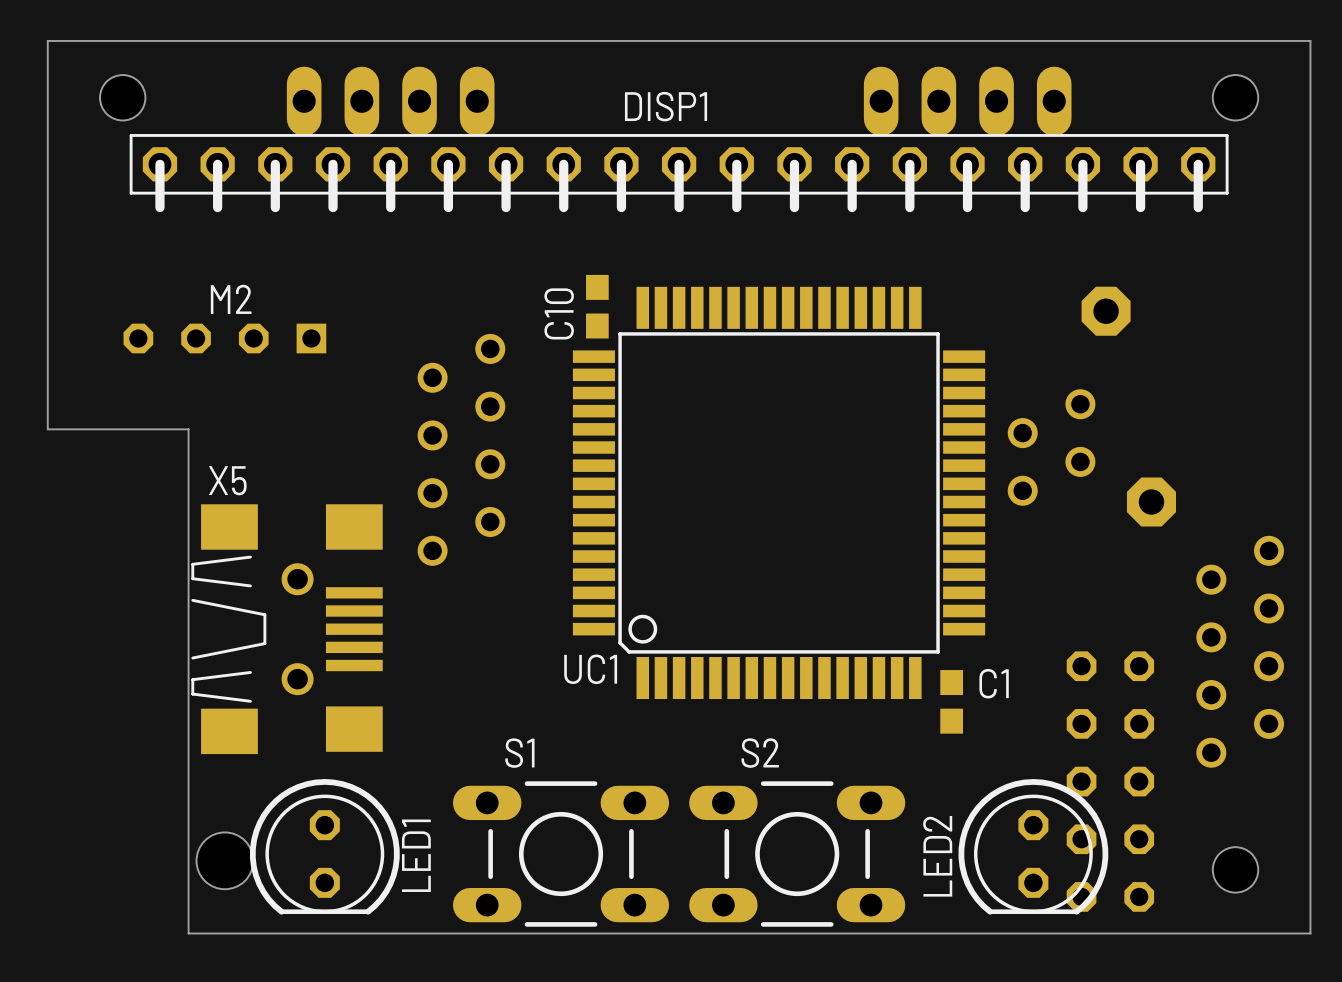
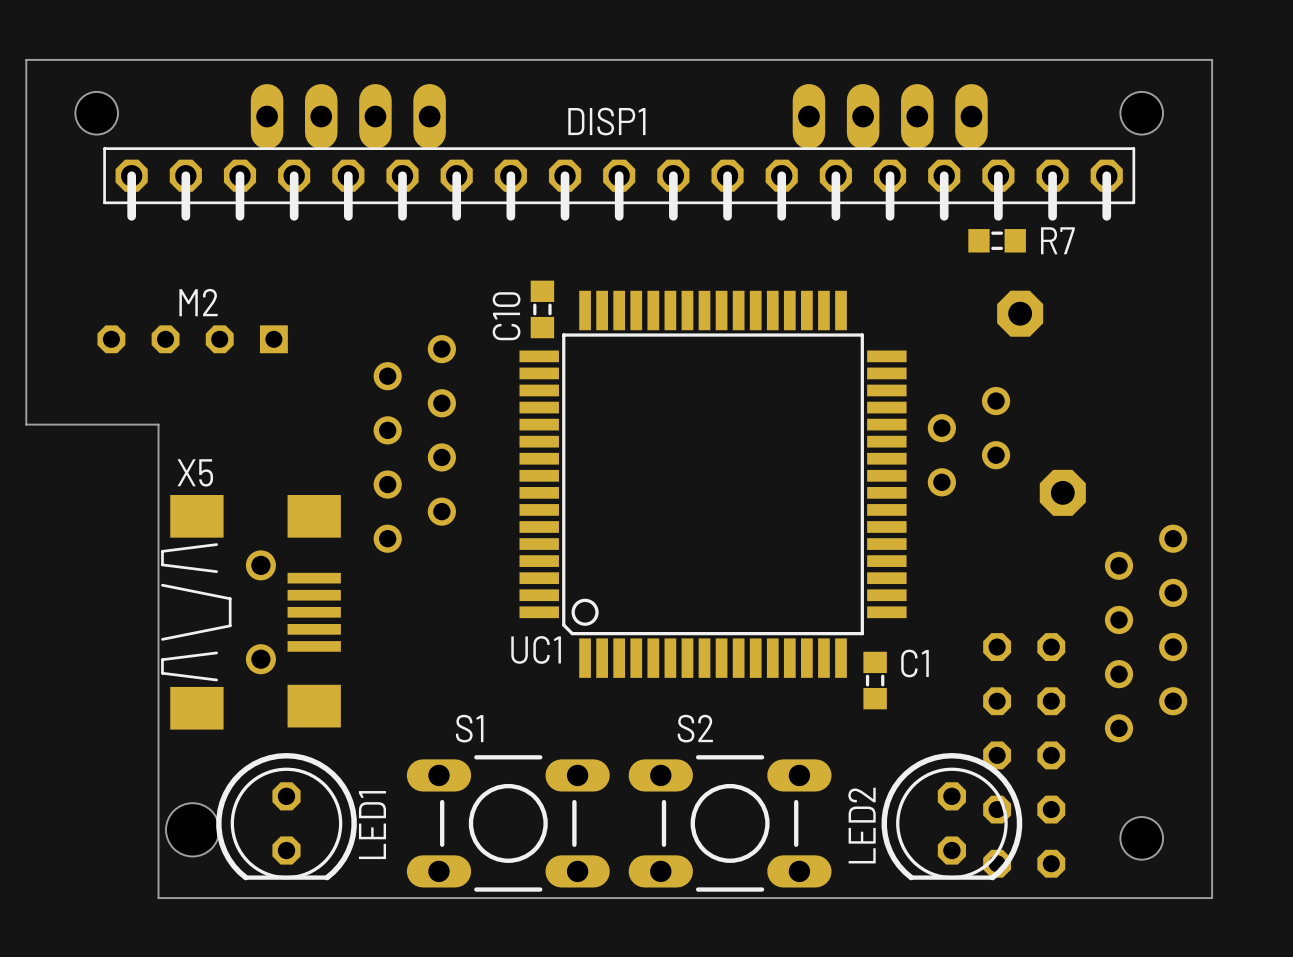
R7: none -> (997, 240)
C10 footprint: [586, 274, 609, 339] -> [530, 280, 555, 339]
C1 footprint: [940, 670, 963, 734] -> [863, 651, 887, 710]

